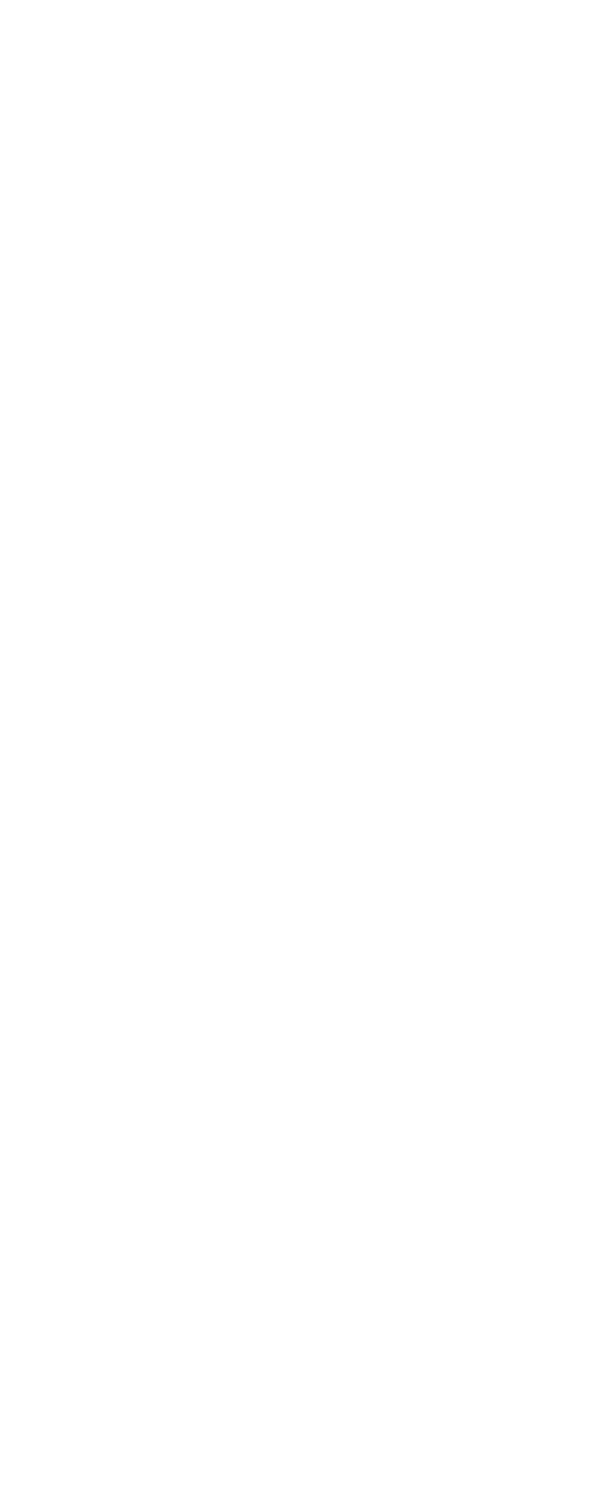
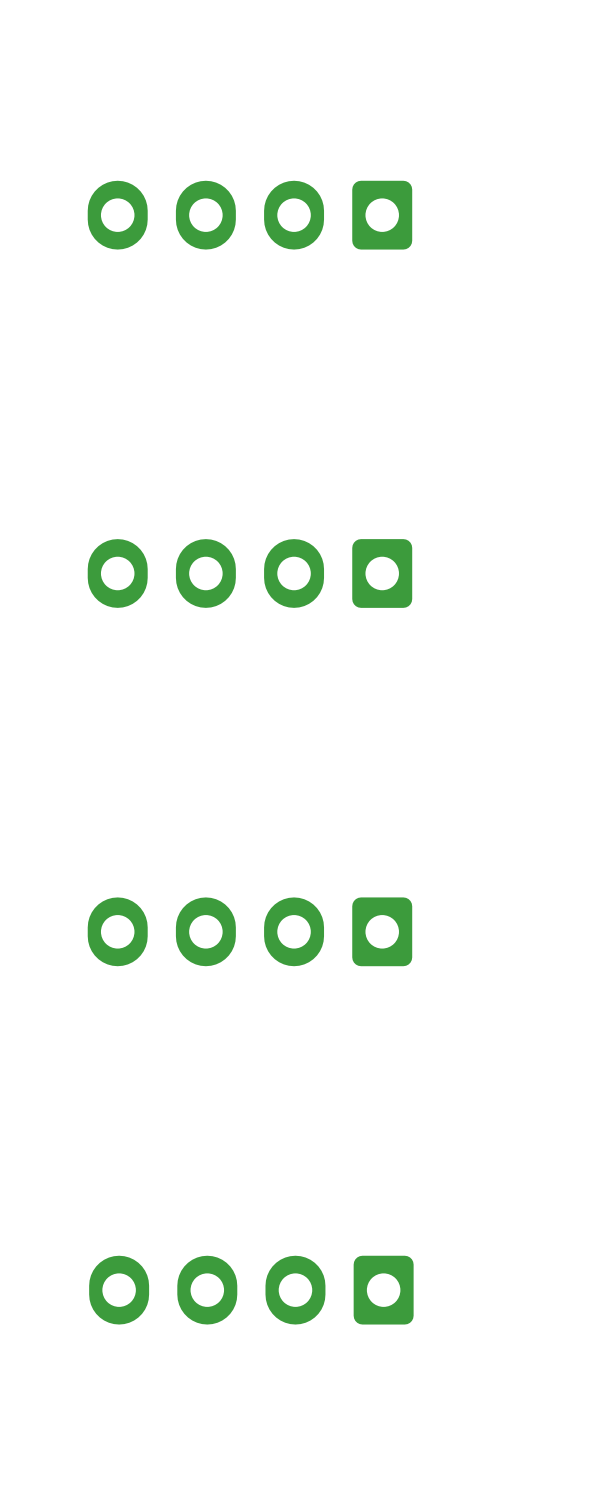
part: none -> (249, 215)
part: none -> (249, 573)
part: none -> (249, 931)
part: none -> (251, 1290)

